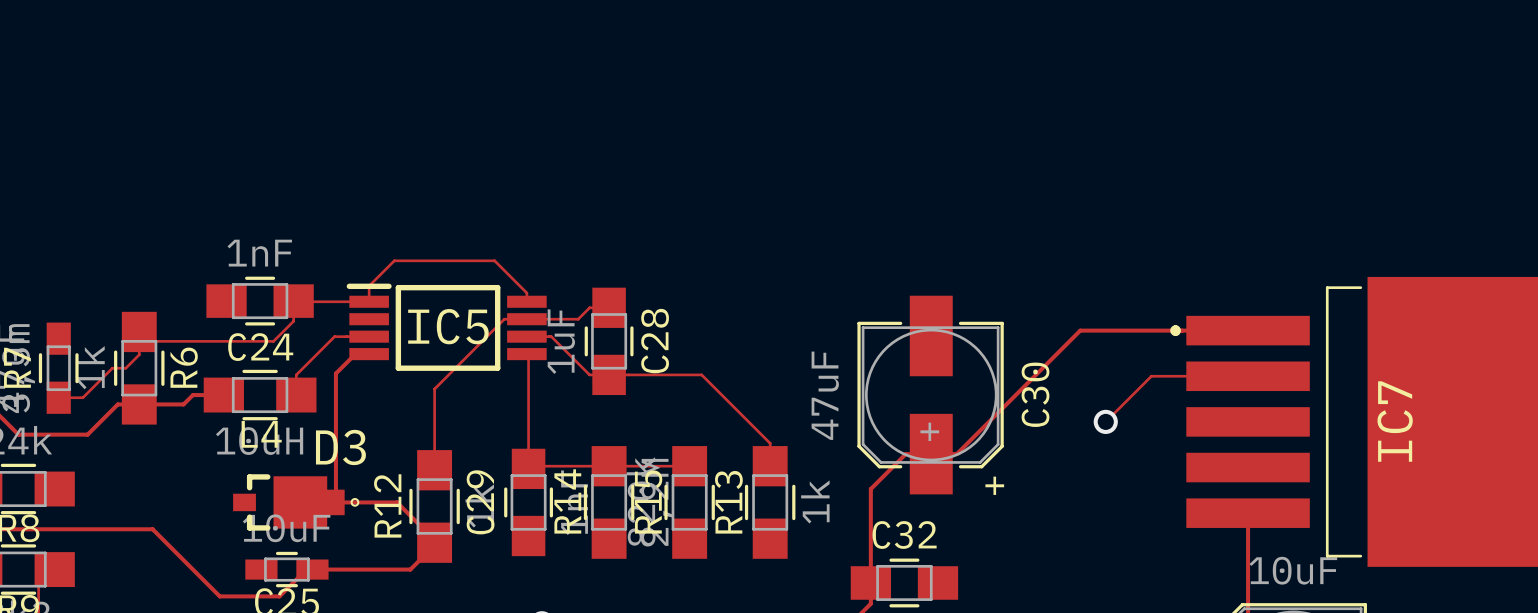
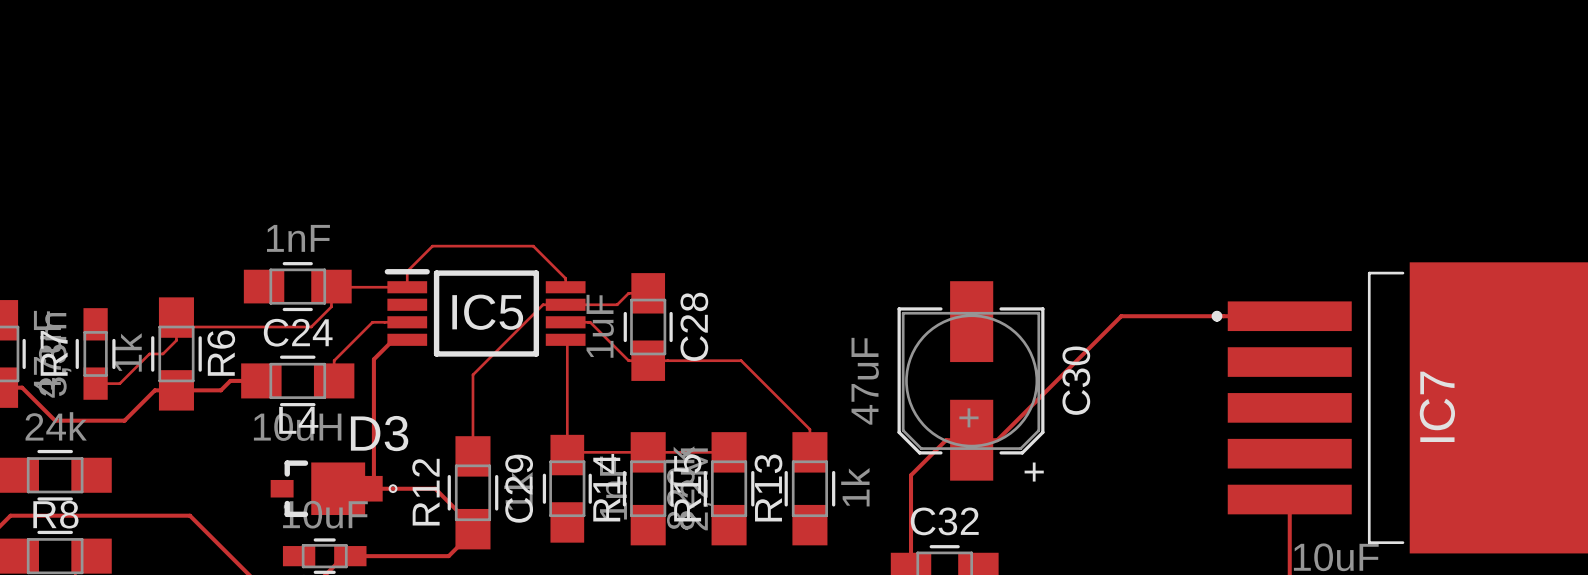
track: (1248, 376) (1151, 376) (1105, 421) -> none
via: (1105, 421) -> none

